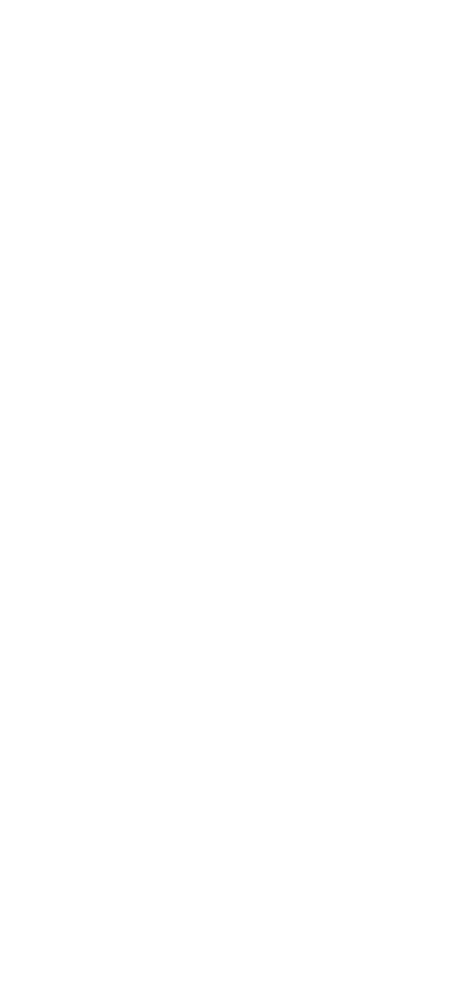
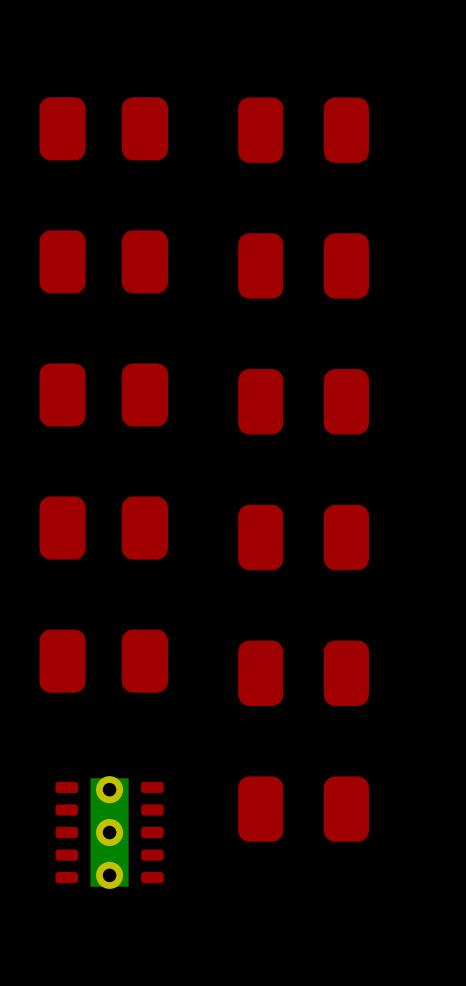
part: none -> (103, 128)
part: none -> (303, 130)
part: none -> (103, 261)
part: none -> (303, 265)
part: none -> (103, 394)
part: none -> (303, 401)
part: none -> (103, 528)
part: none -> (303, 537)
part: none -> (103, 661)
part: none -> (303, 673)
part: none -> (303, 809)
part: none -> (109, 832)

